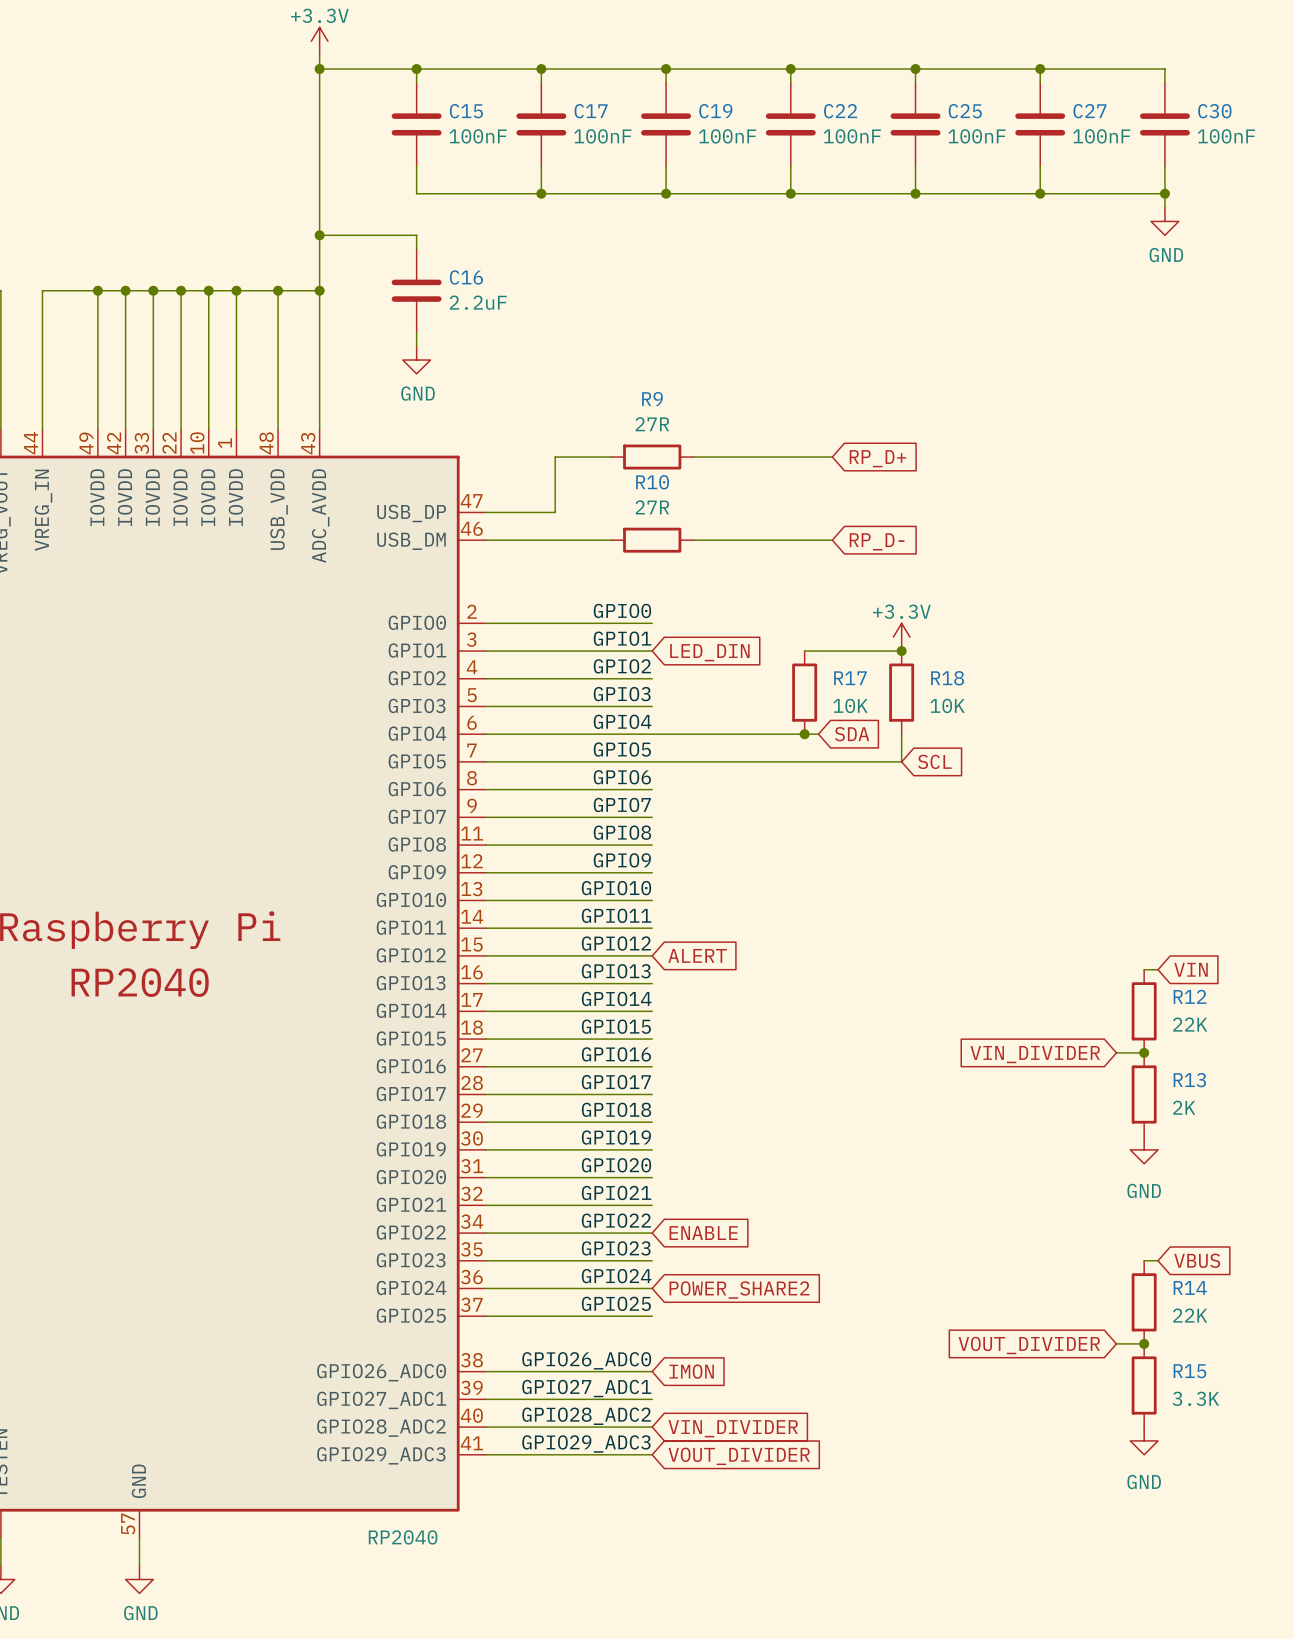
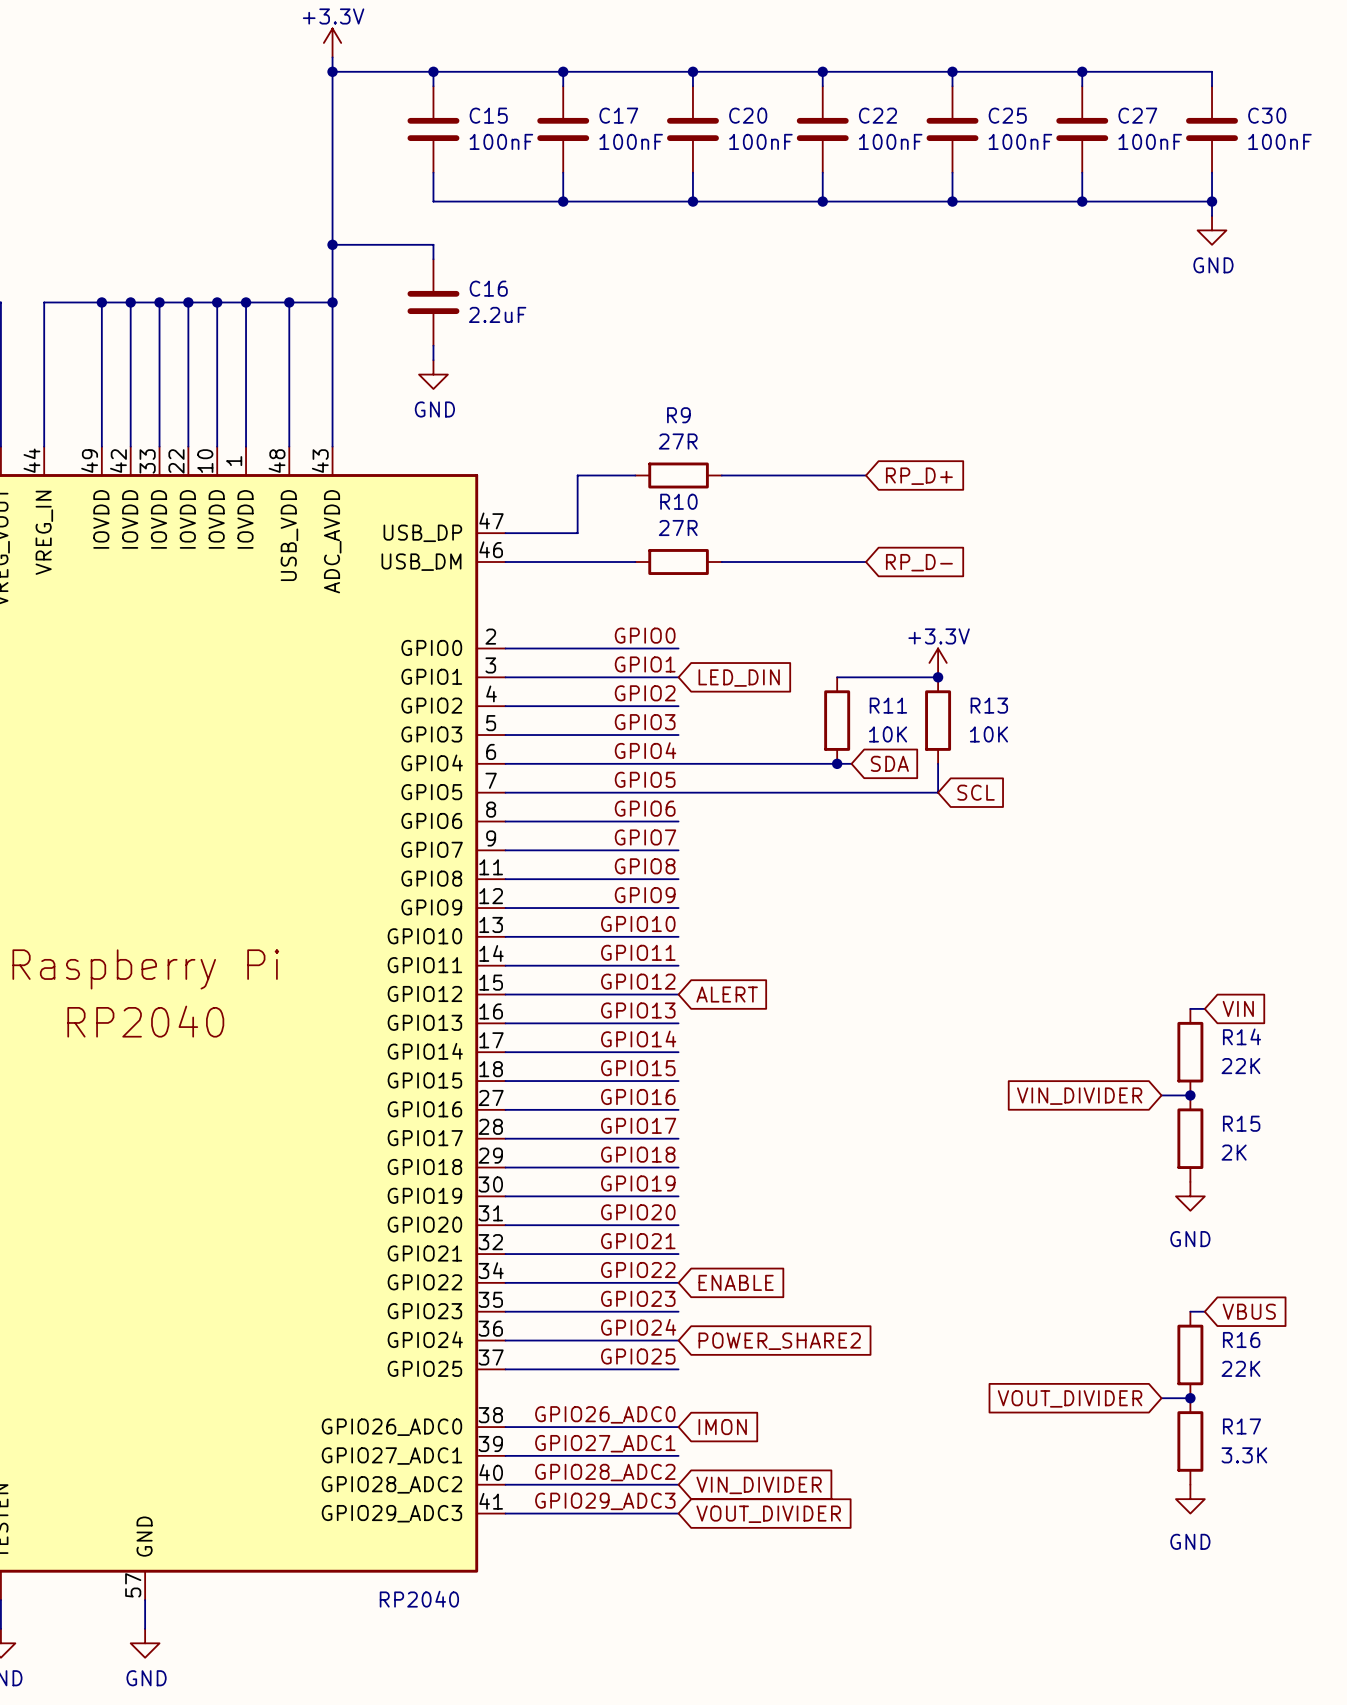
C19 name: C19 (715, 111) -> C20 (748, 115)
R17 name: R17 (850, 678) -> R11 (888, 705)
R18 name: R18 (947, 678) -> R13 (989, 705)
R12 name: R12 (1190, 996) -> R14 (1241, 1036)
R13 name: R13 (1189, 1080) -> R15 (1241, 1123)
R14 name: R14 (1190, 1287) -> R16 (1241, 1340)
R15 name: R15 (1189, 1371) -> R17 (1241, 1426)

